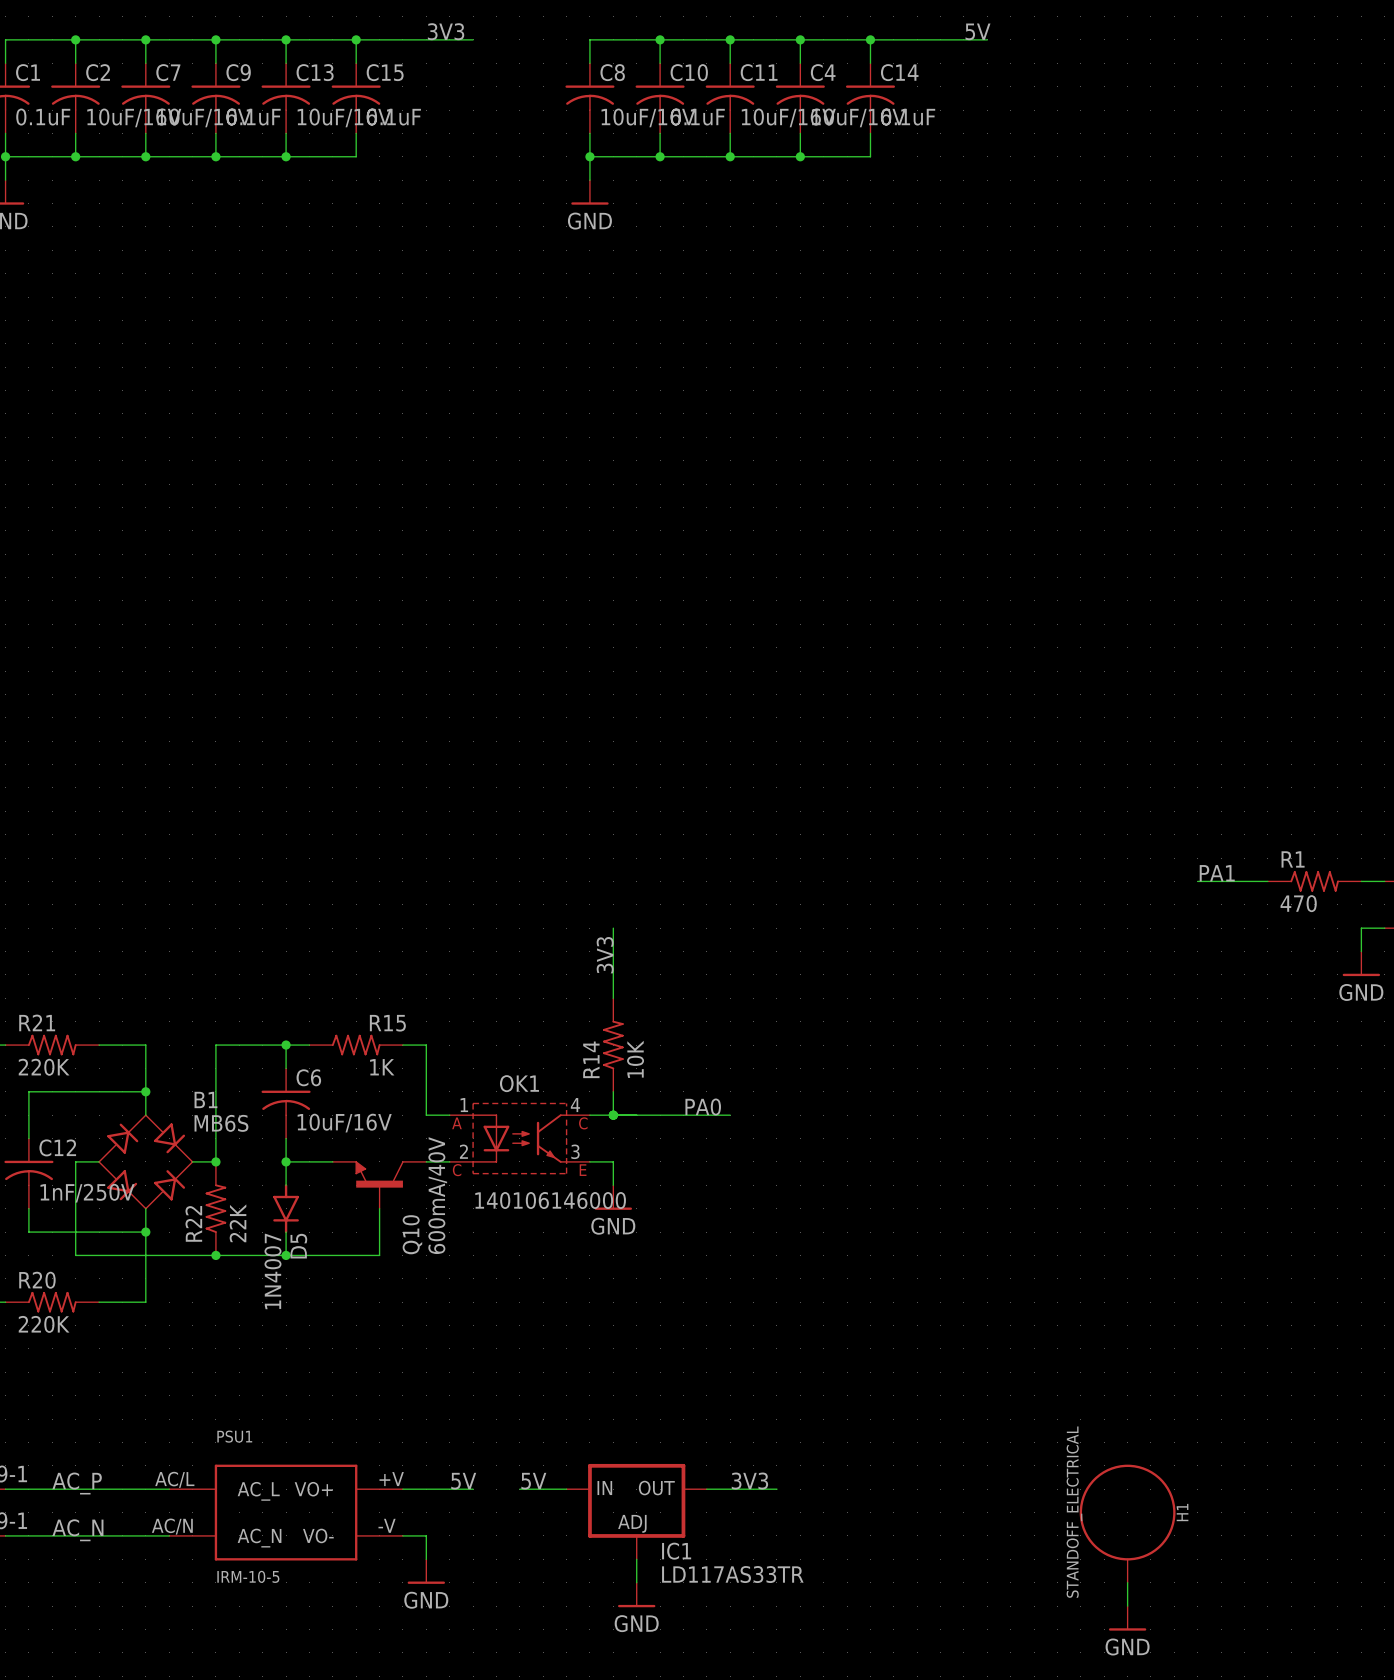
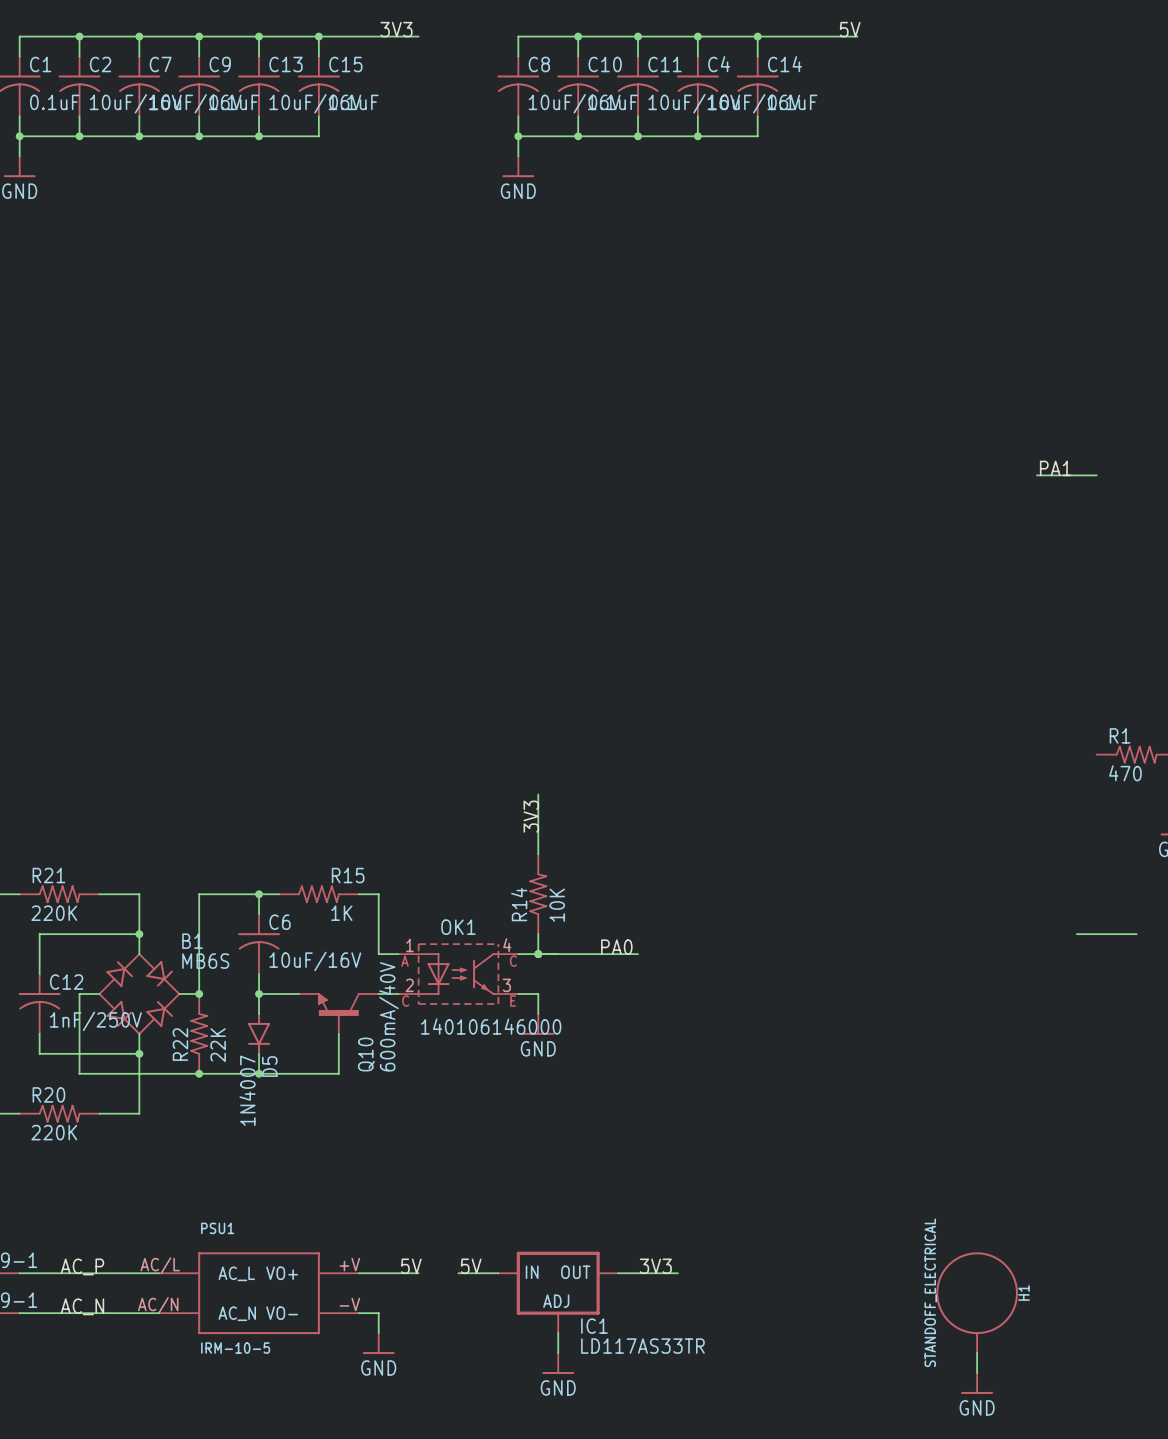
label: none -> PA1 (1055, 468)
wire: none -> (1036, 475) (1096, 475)
label: PA1 (1217, 873) -> none
wire: (1197, 881) (1267, 881) -> (1076, 934) (1136, 934)

